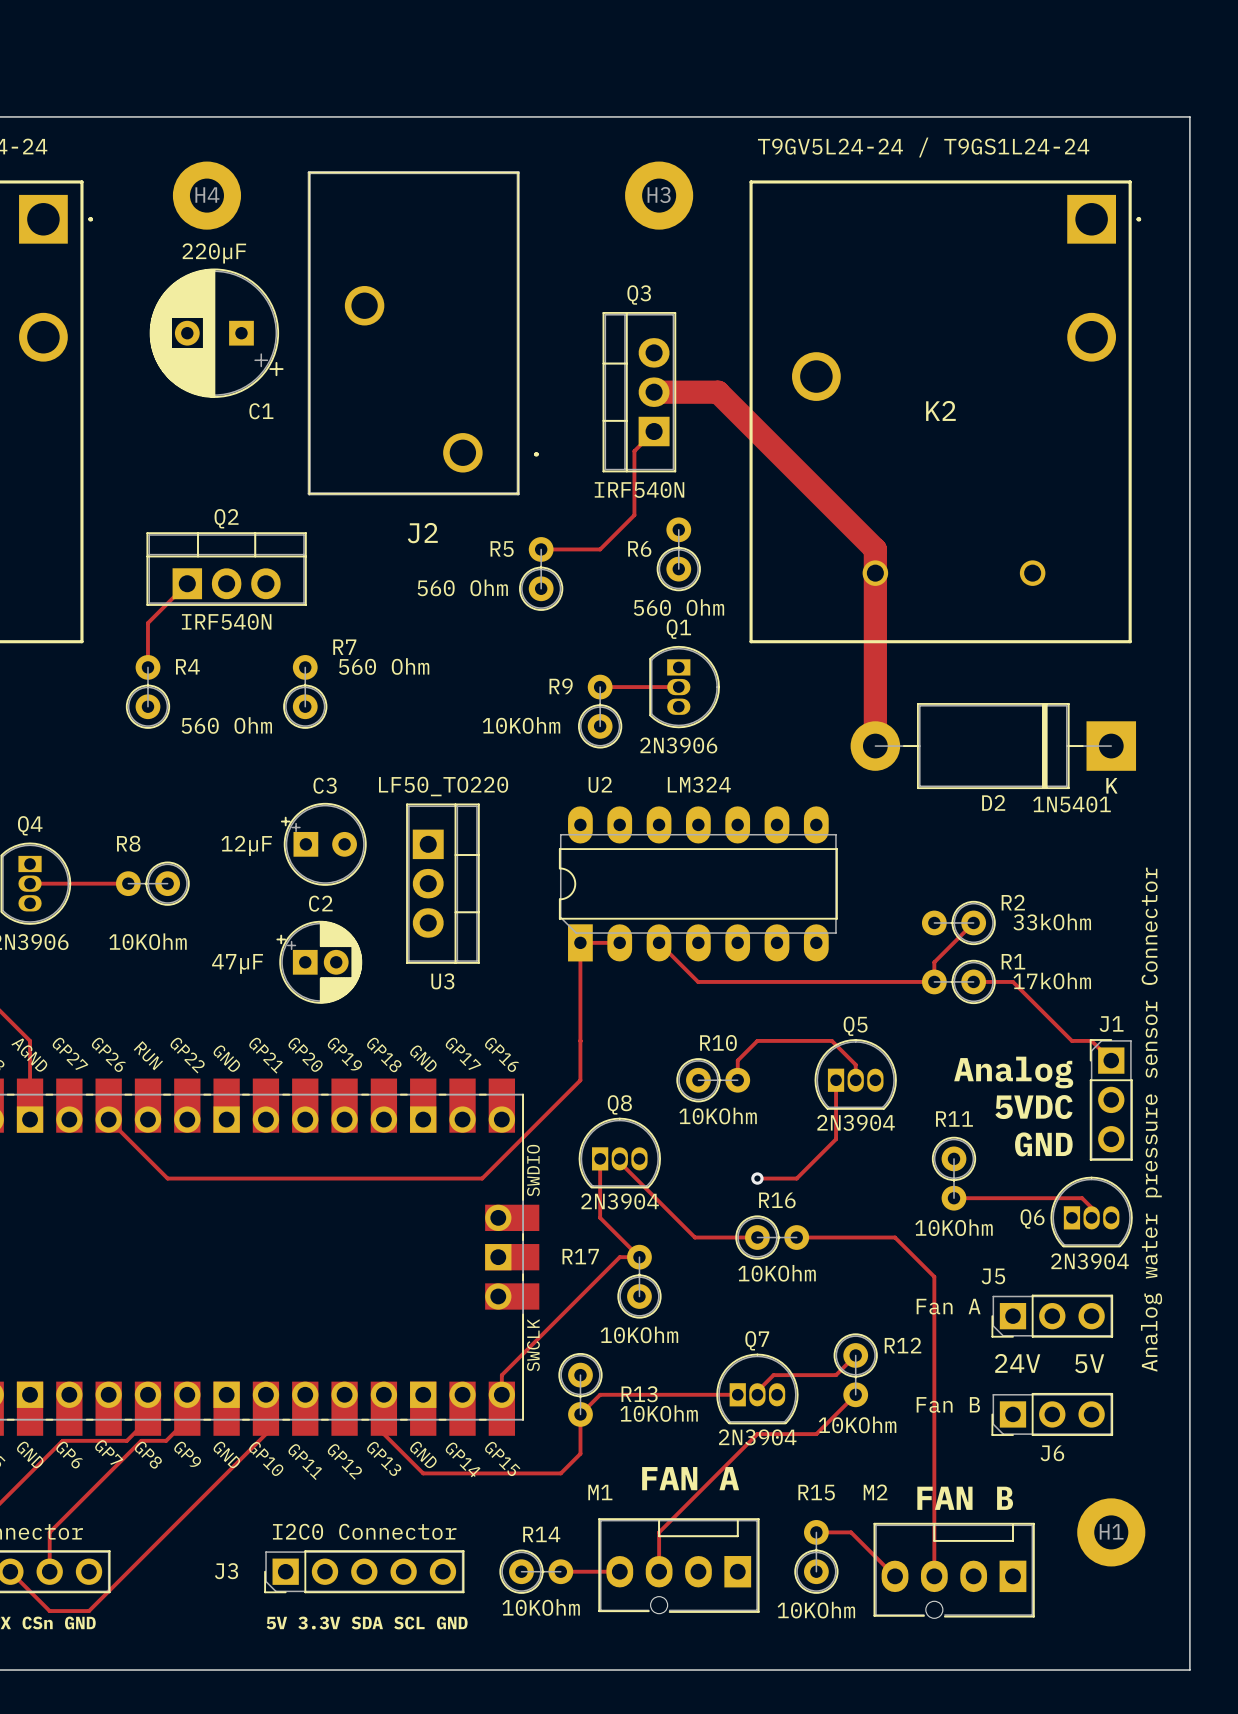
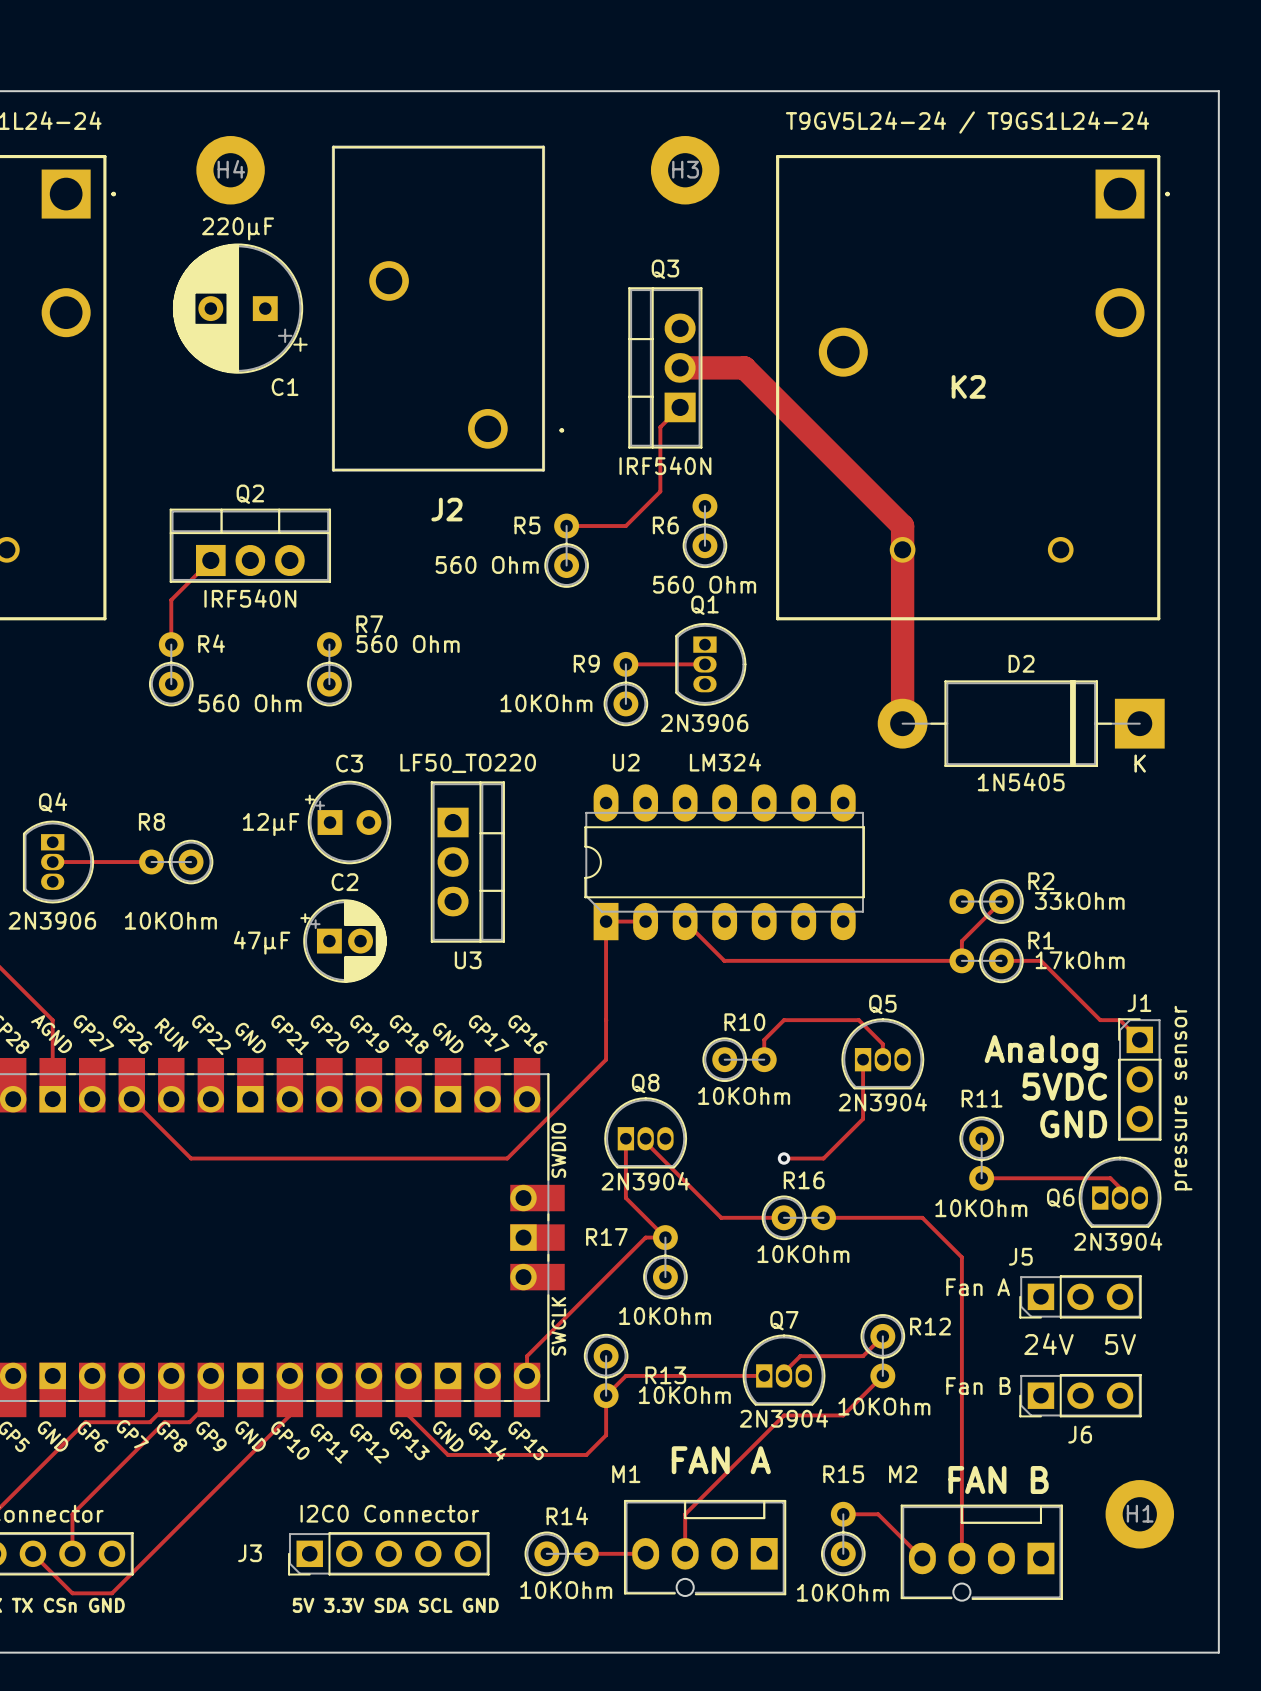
D2 name position: D2 (993, 802) -> D2 (1021, 663)
D2 value: 1N5401 (1072, 804) -> 1N5405 (1021, 782)
J1 value: Analog water pressure sensor Connector (1151, 1119) -> pressure sensor (1183, 1098)

